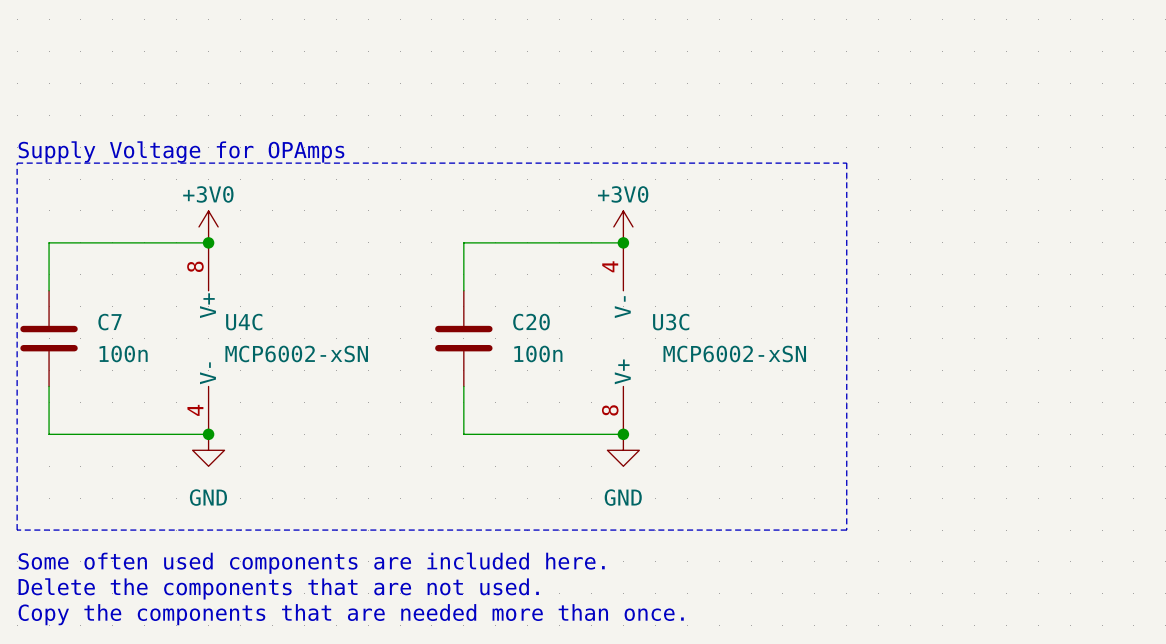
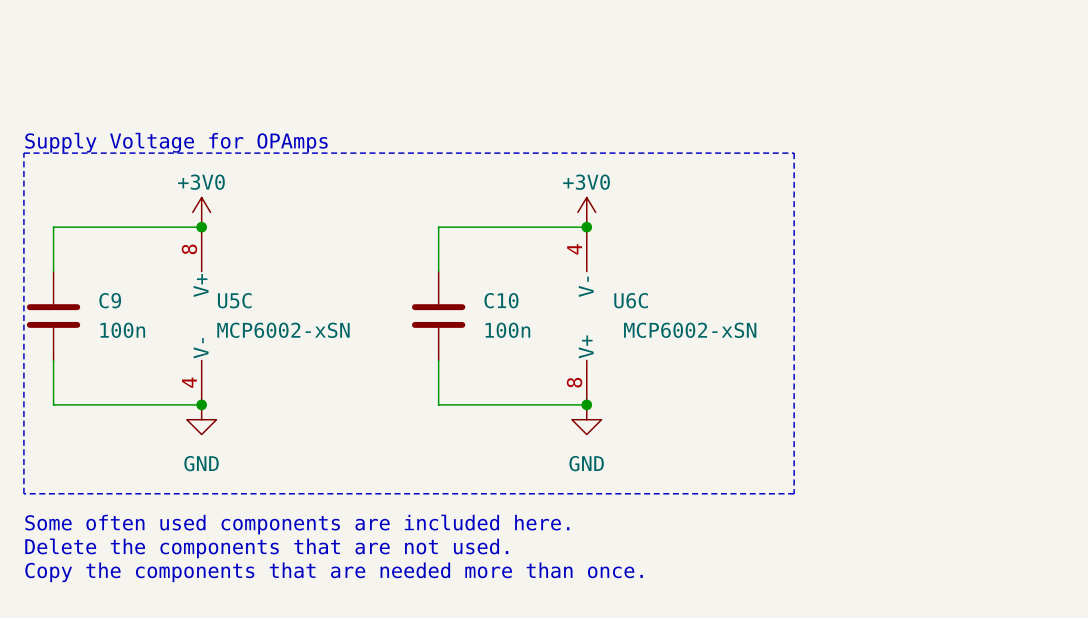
C7 name: C7 (109, 322) -> C9 (110, 300)
U4C name: U4C (244, 322) -> U5C (234, 300)
C20 name: C20 (531, 322) -> C10 (501, 300)
U3C name: U3C (671, 322) -> U6C (631, 300)

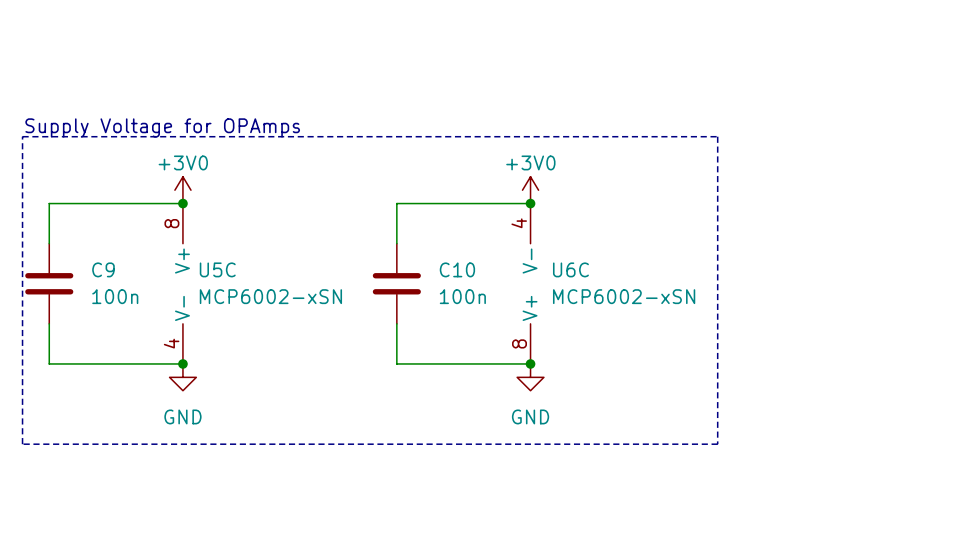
text: Some often used components are included here. (297, 524) -> none
text: Delete the components that are not used. (266, 548) -> none
text: Copy the components that are needed more than once. (334, 572) -> none

